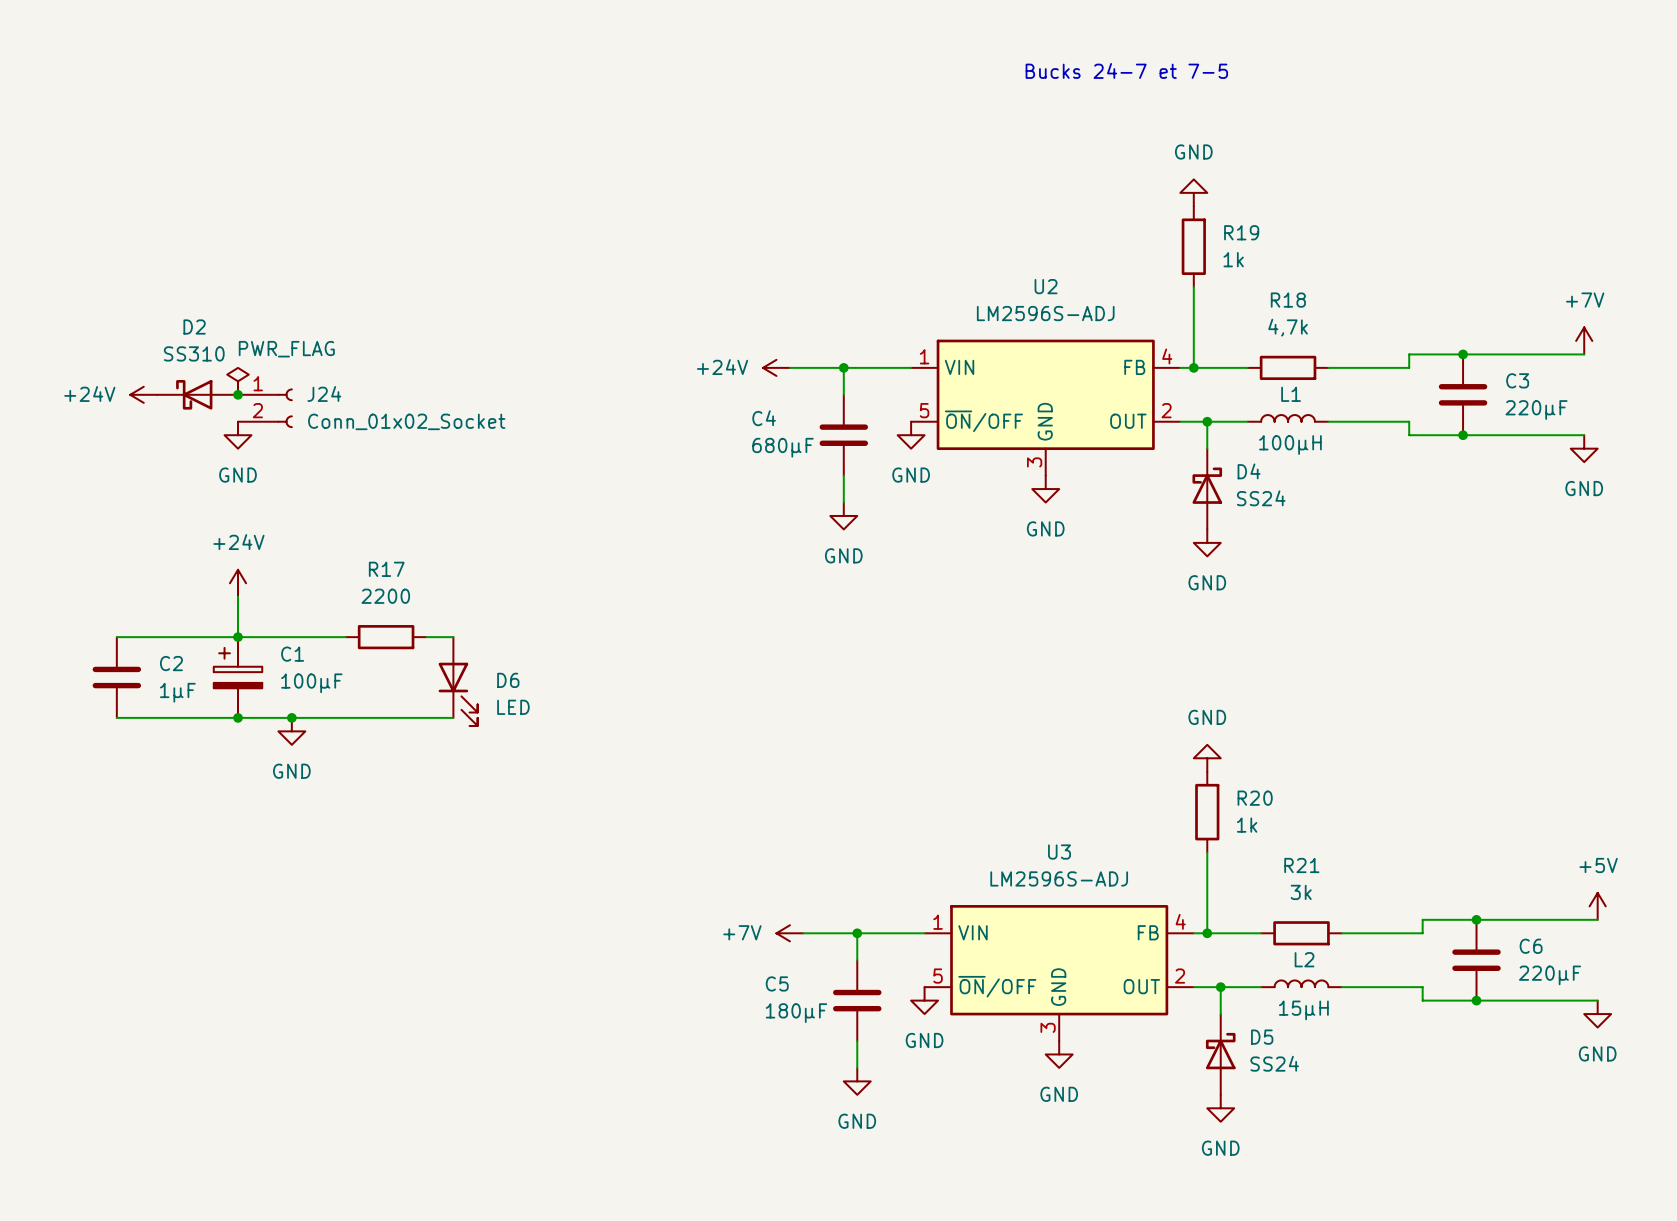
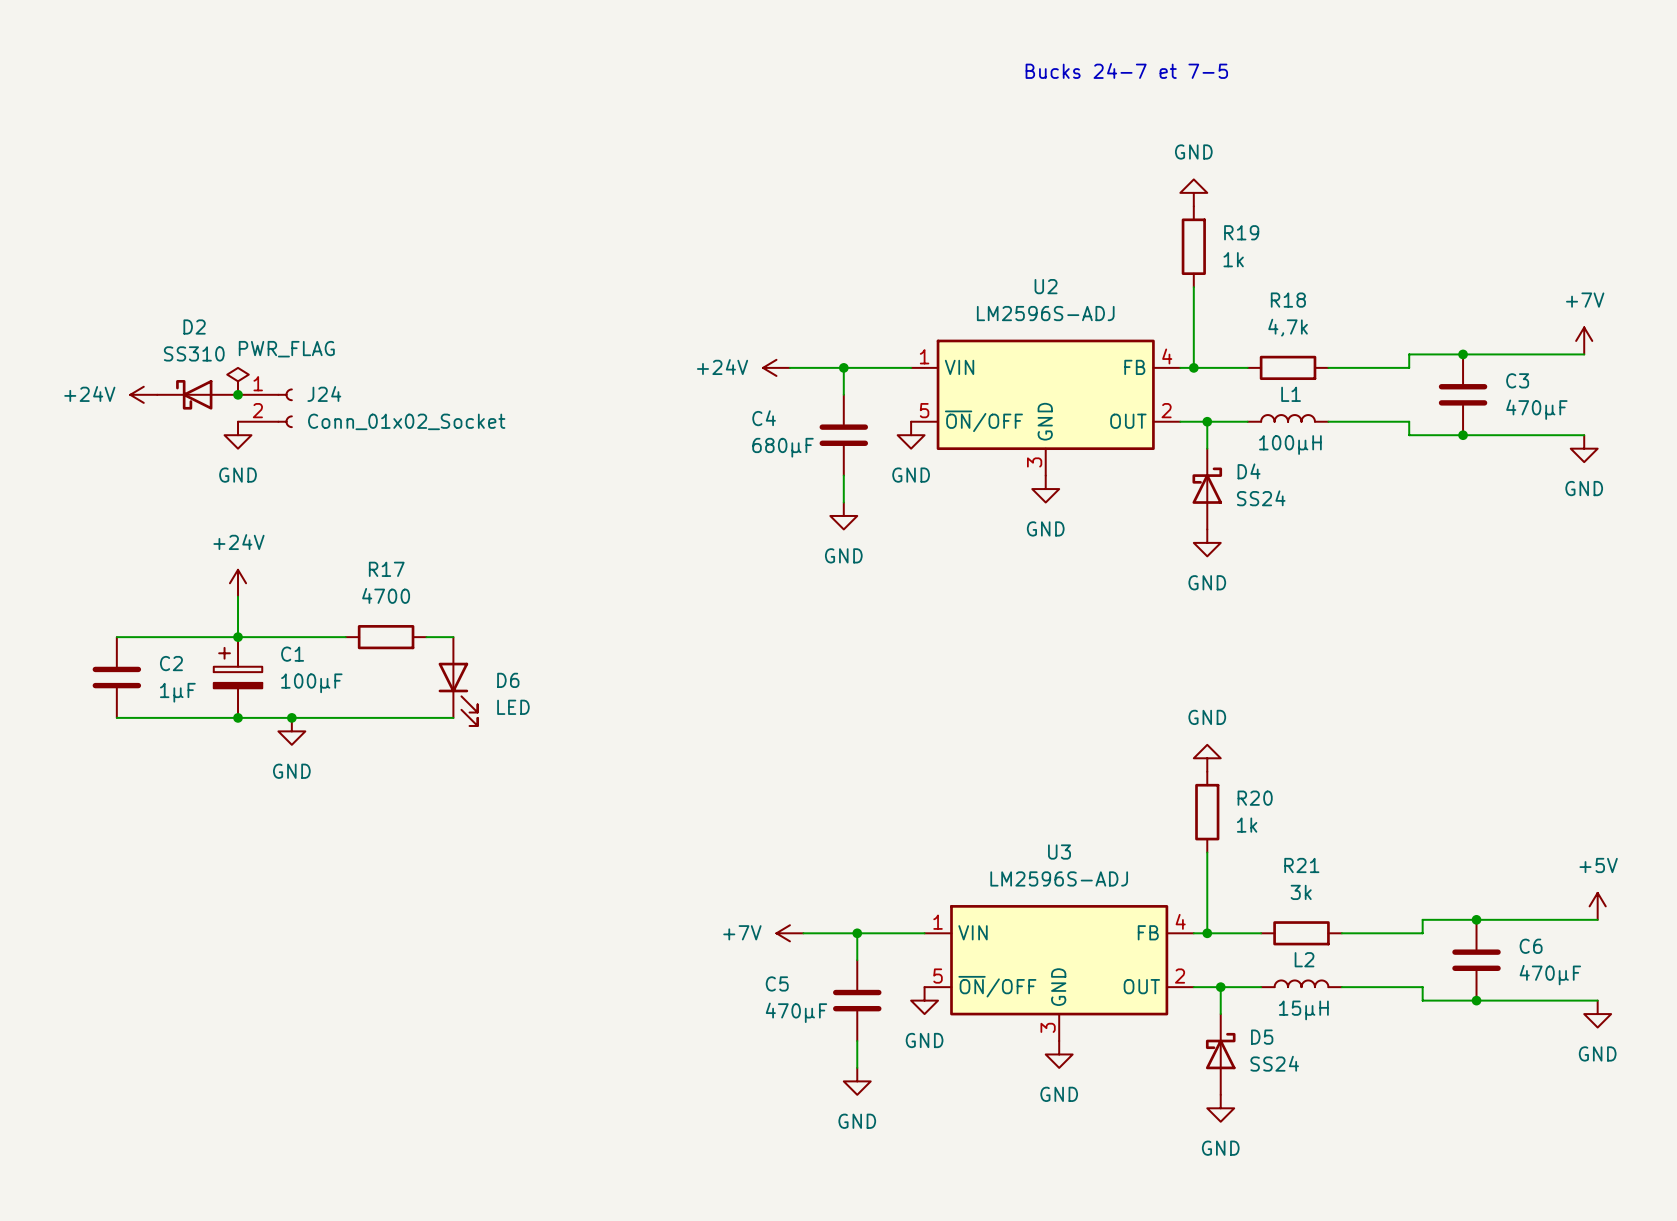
C3 value: 220µF (1536, 410) -> 470µF (1536, 409)
R17 value: 2200 (385, 596) -> 4700 (386, 595)
C6 value: 220µF (1550, 975) -> 470µF (1550, 975)
C5 value: 180µF (796, 1013) -> 470µF (796, 1012)

